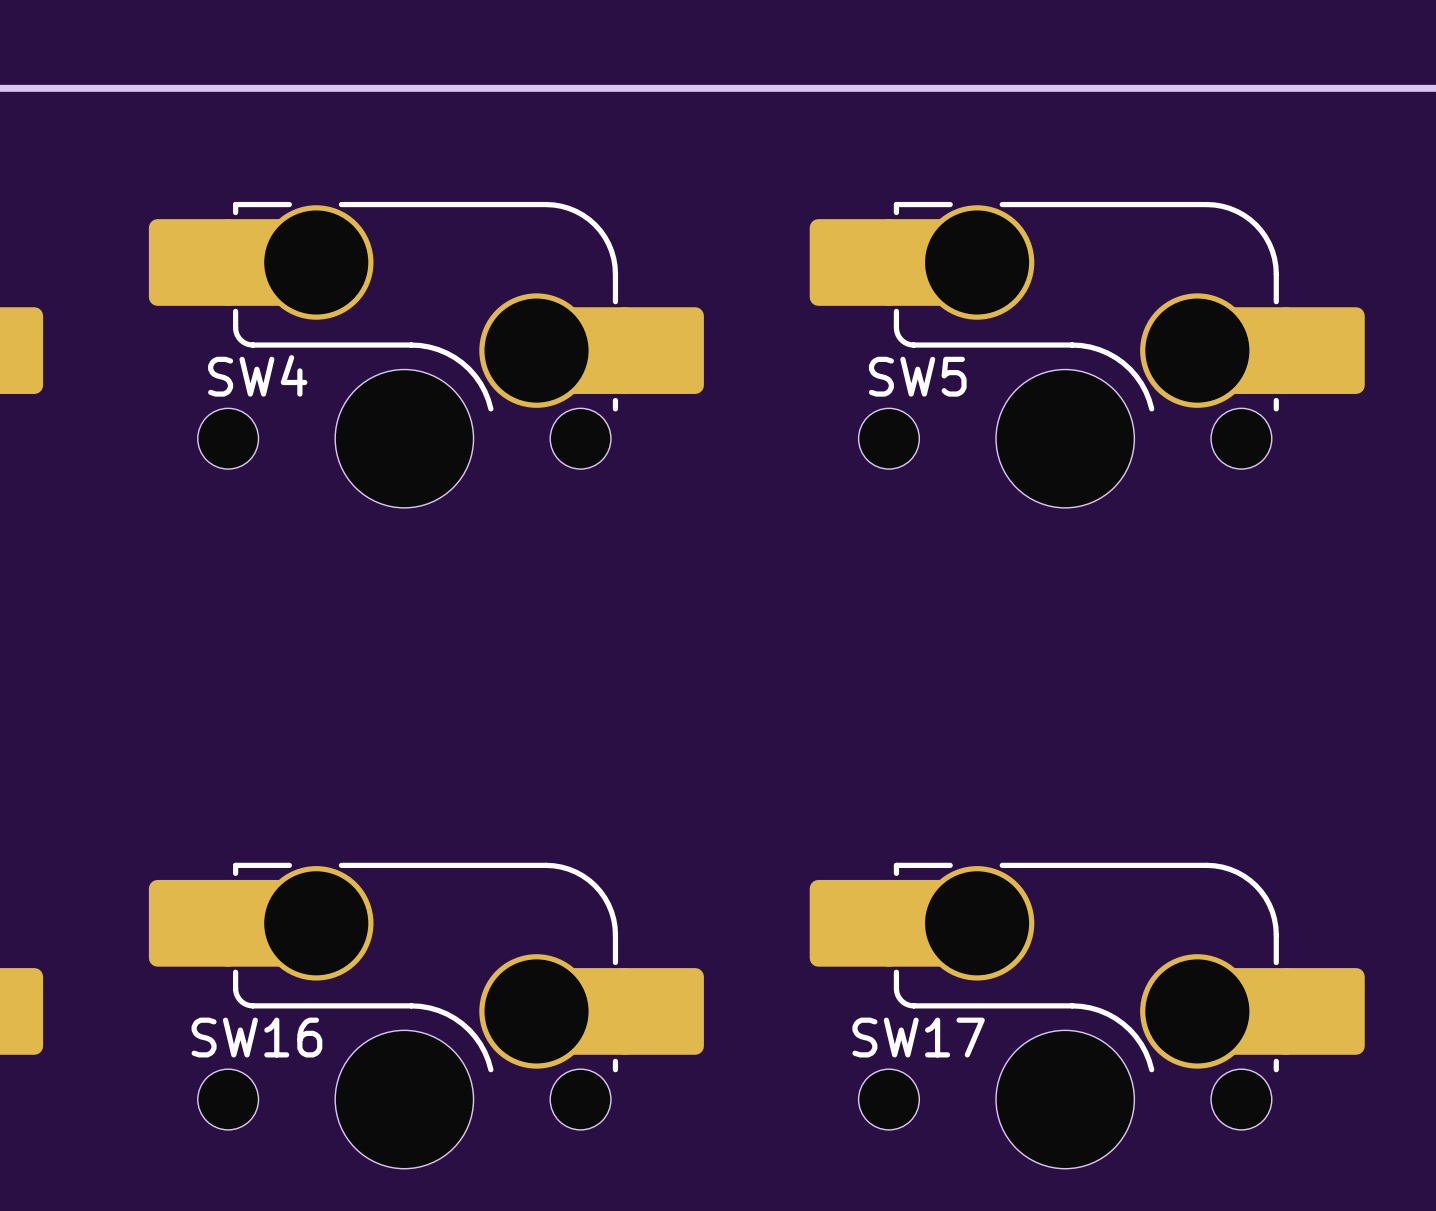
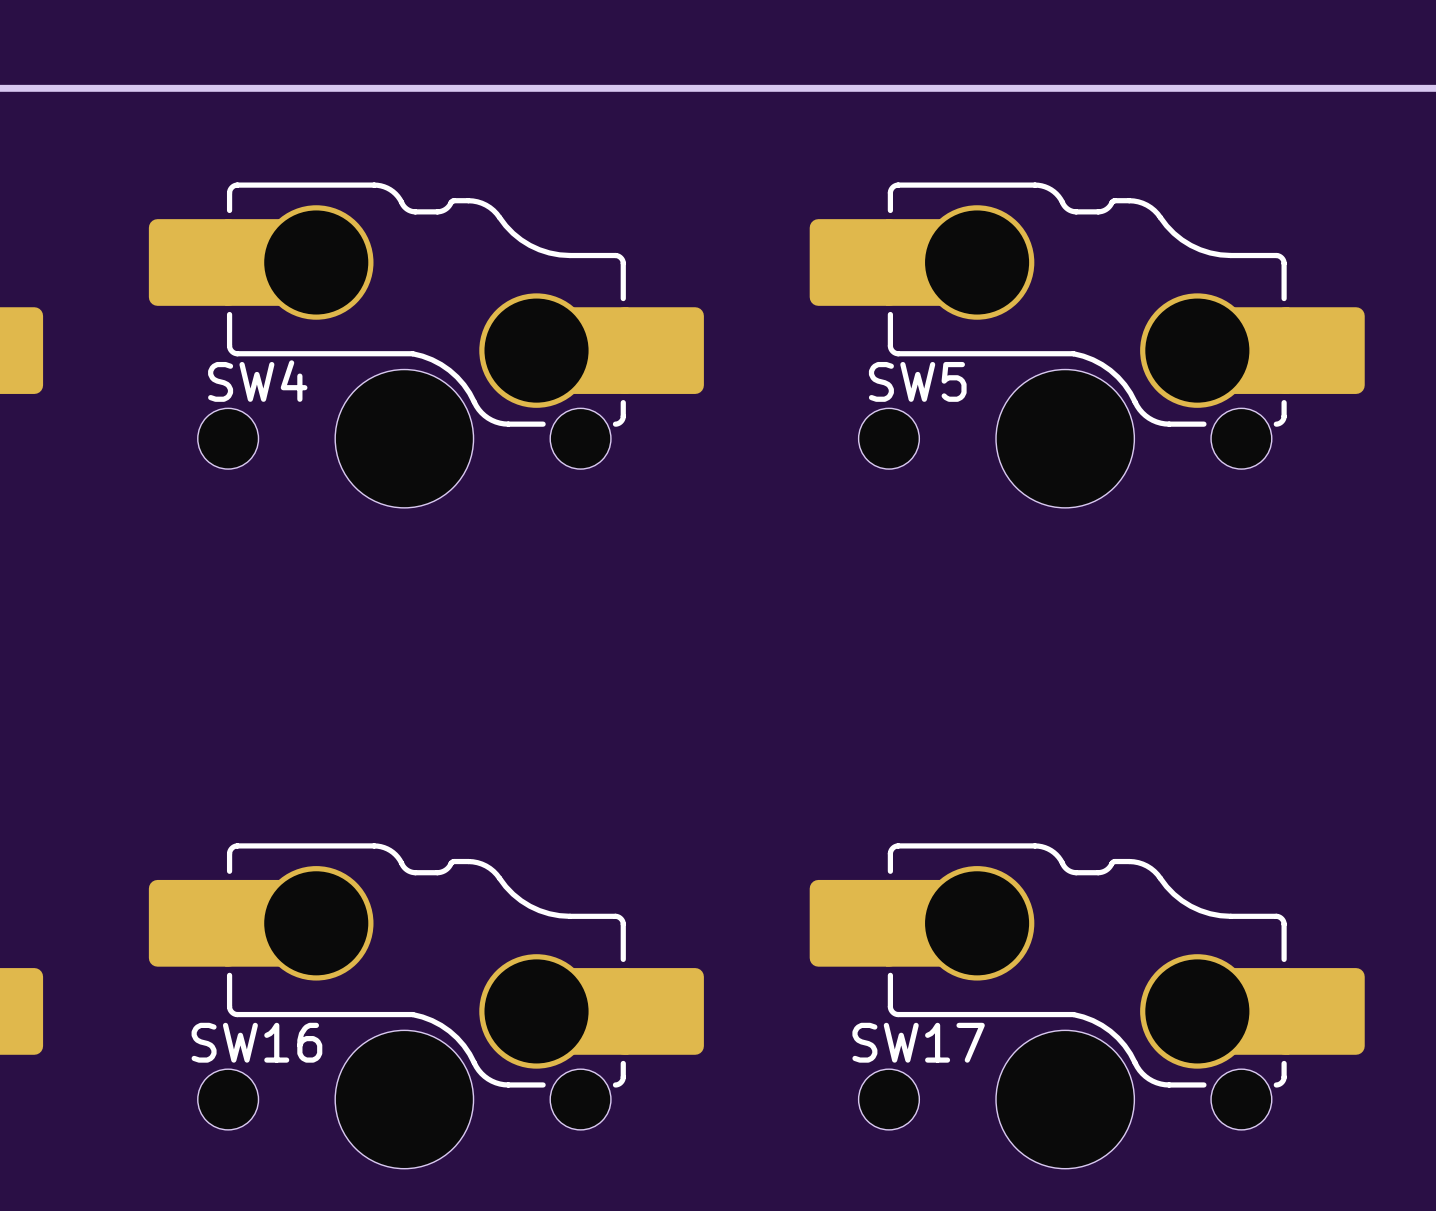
SW4 footprint: [148, 201, 704, 508] -> [148, 182, 704, 508]
SW5 footprint: [809, 201, 1365, 508] -> [809, 182, 1365, 508]
SW16 footprint: [148, 862, 704, 1169] -> [148, 843, 704, 1169]
SW17 footprint: [809, 862, 1365, 1169] -> [809, 843, 1365, 1169]

